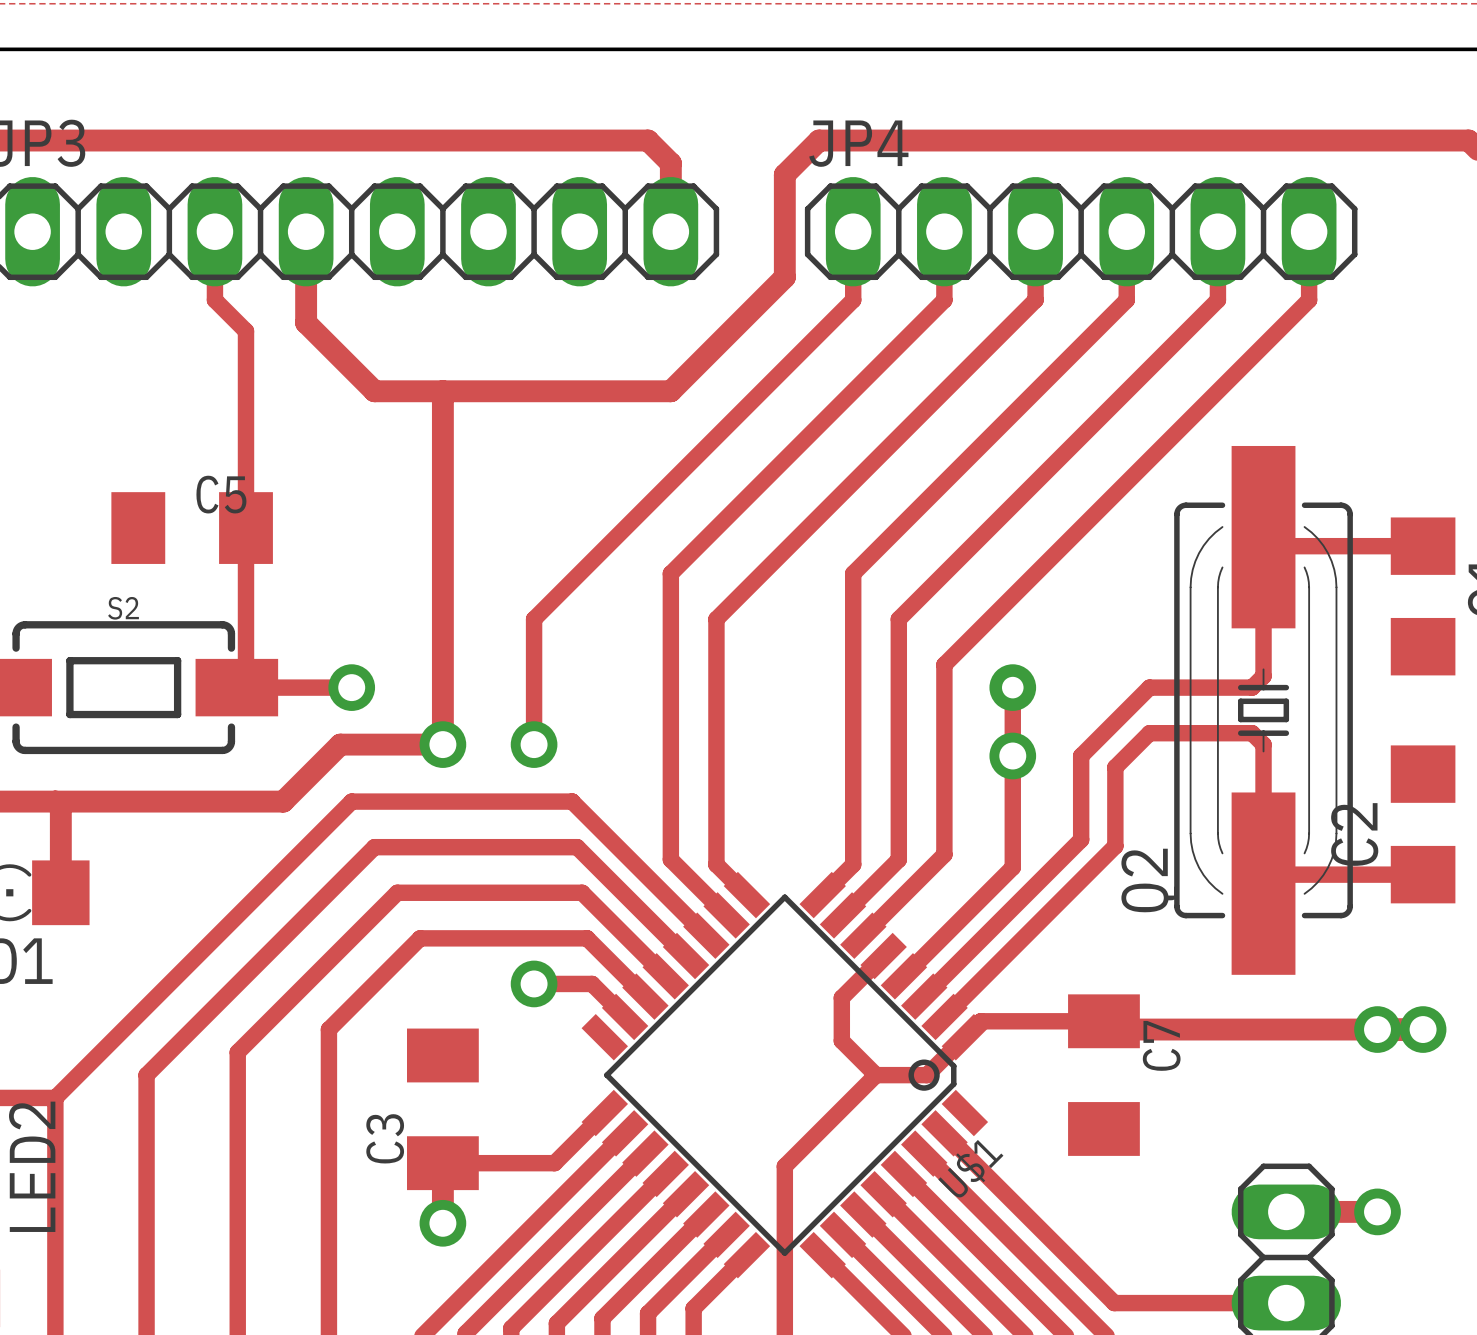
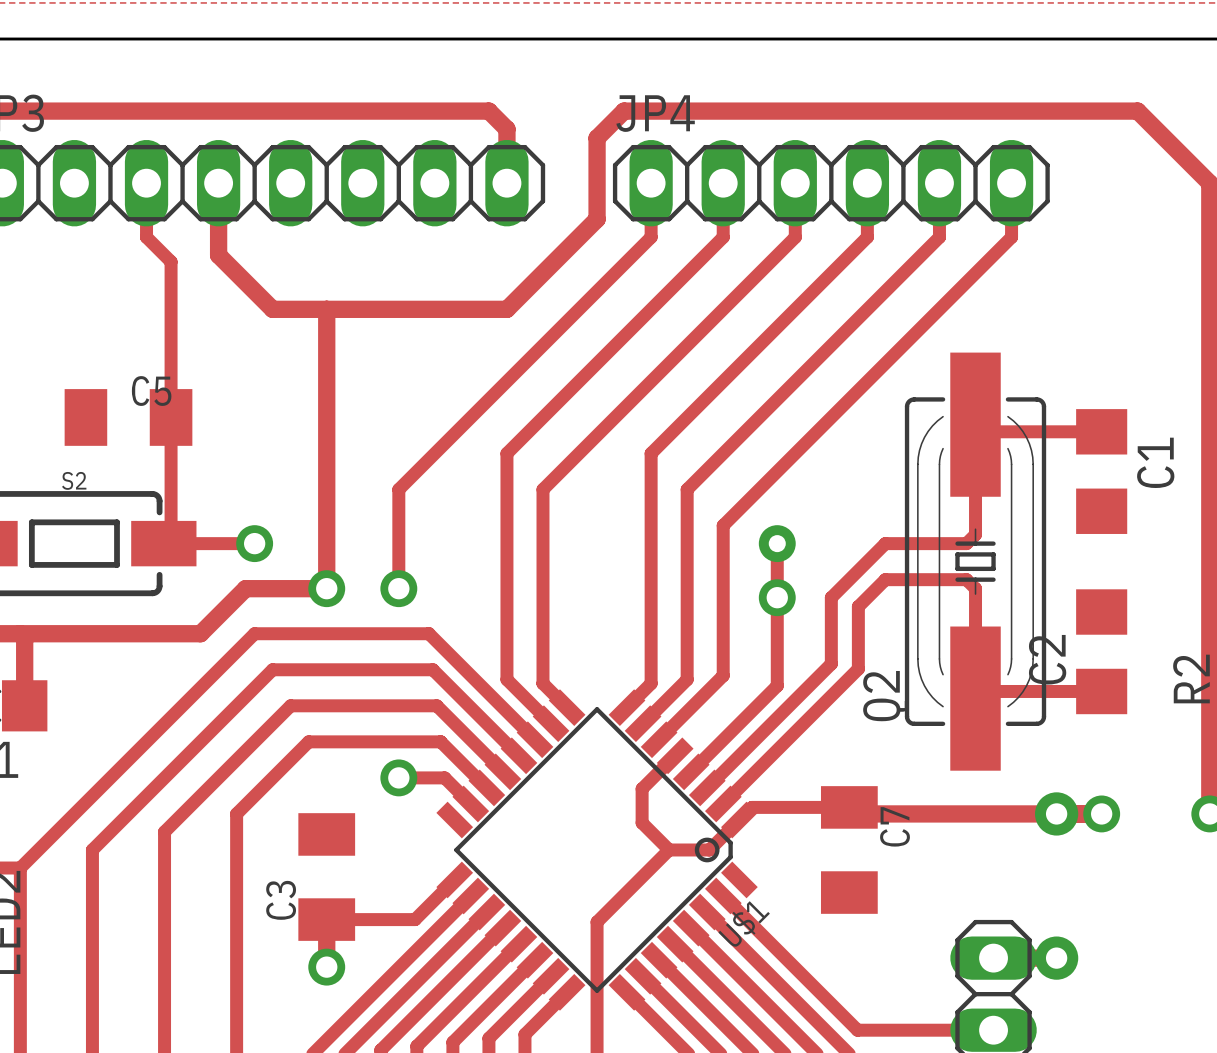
via size: [1354, 1006, 1401, 1053] -> [1034, 792, 1079, 836]
via size: [1354, 1188, 1401, 1236] -> [1034, 936, 1079, 980]

